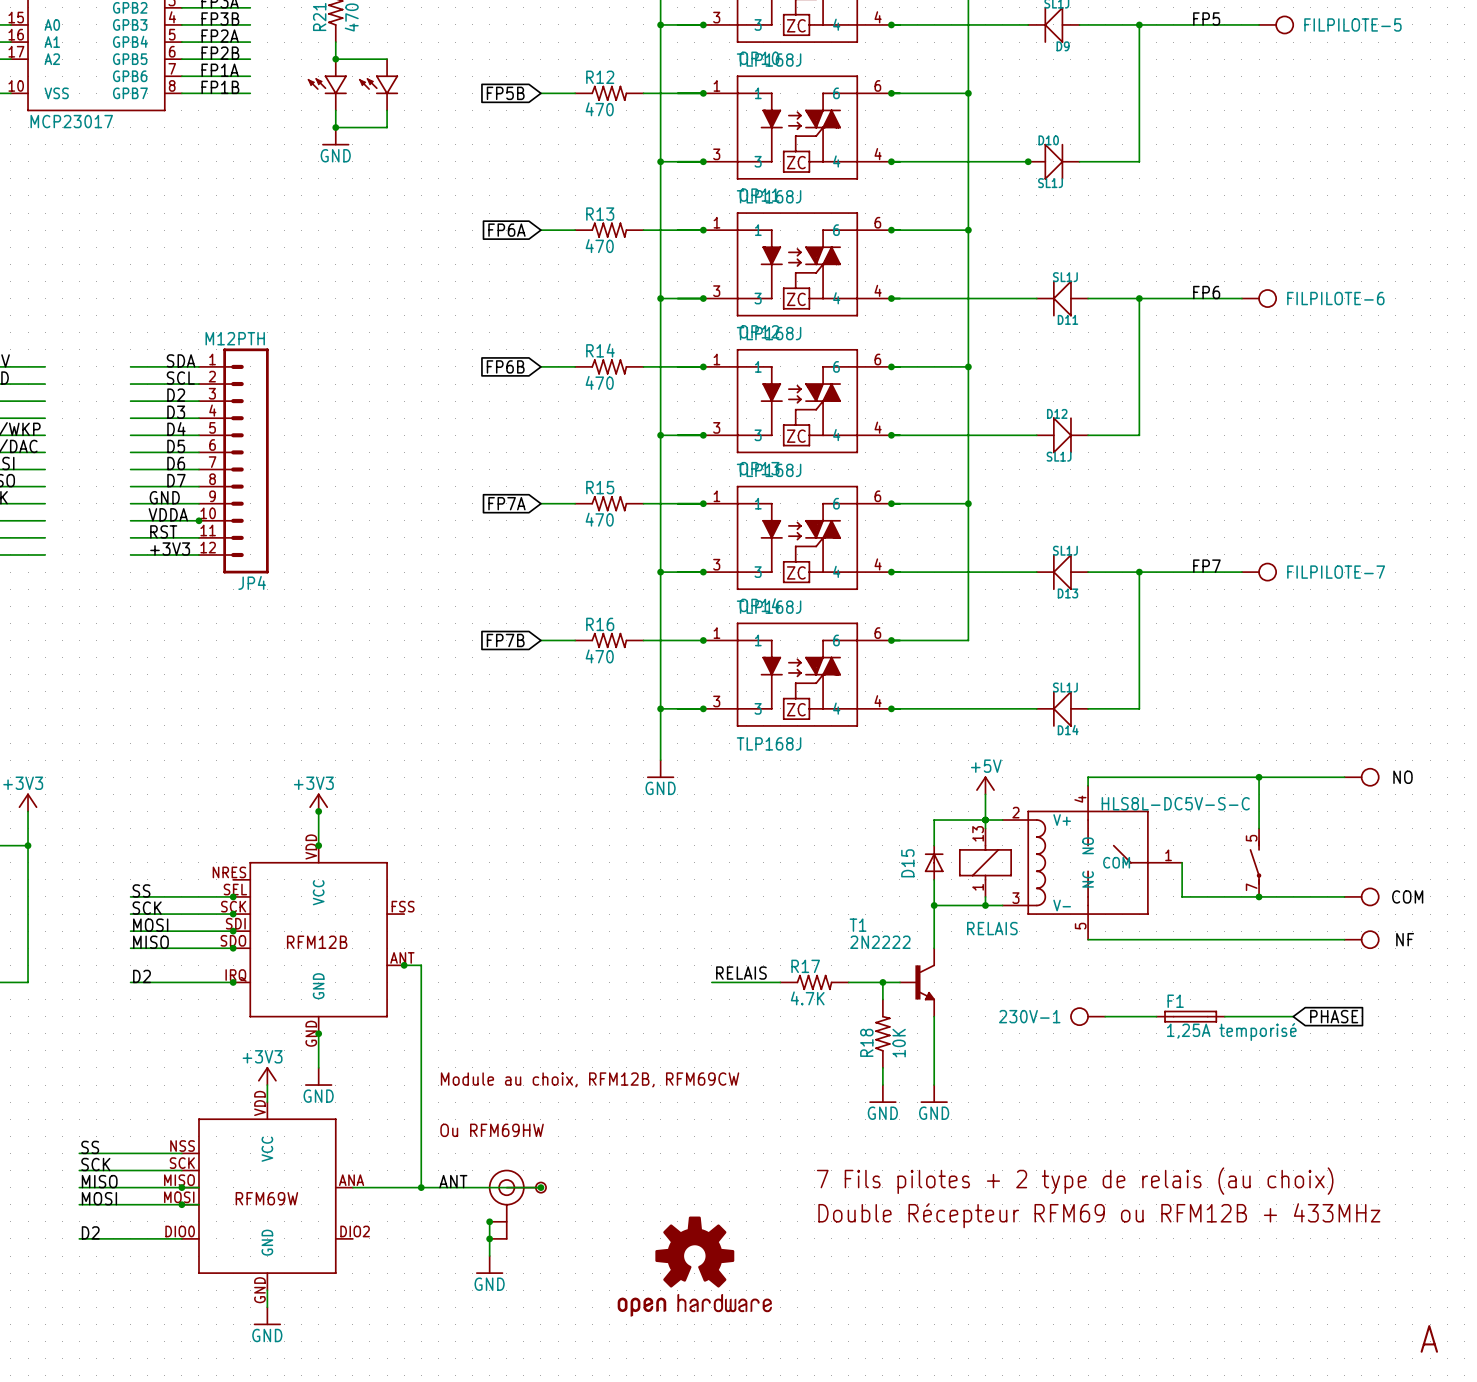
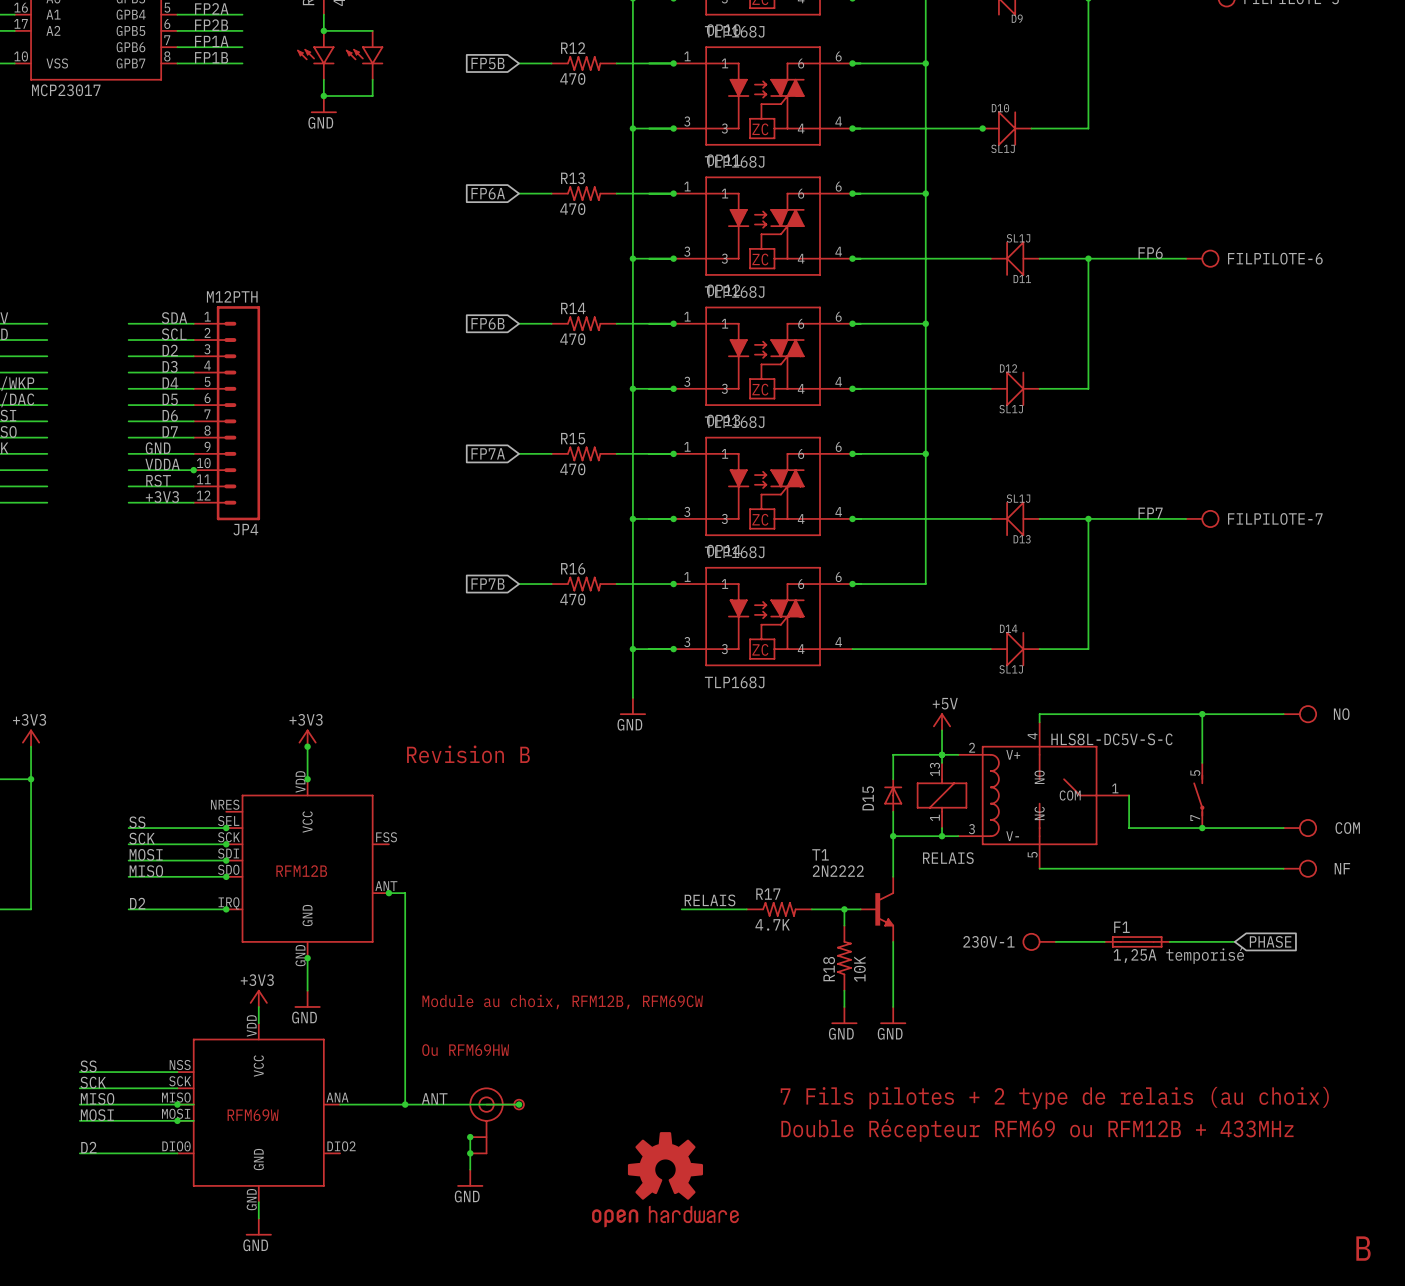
junction: (891, 708) -> none
D14 rotation: 0° (1062, 708) -> 180° (1015, 649)
text: none -> Revision B (468, 754)
text: A (1429, 1338) -> B (1363, 1248)

